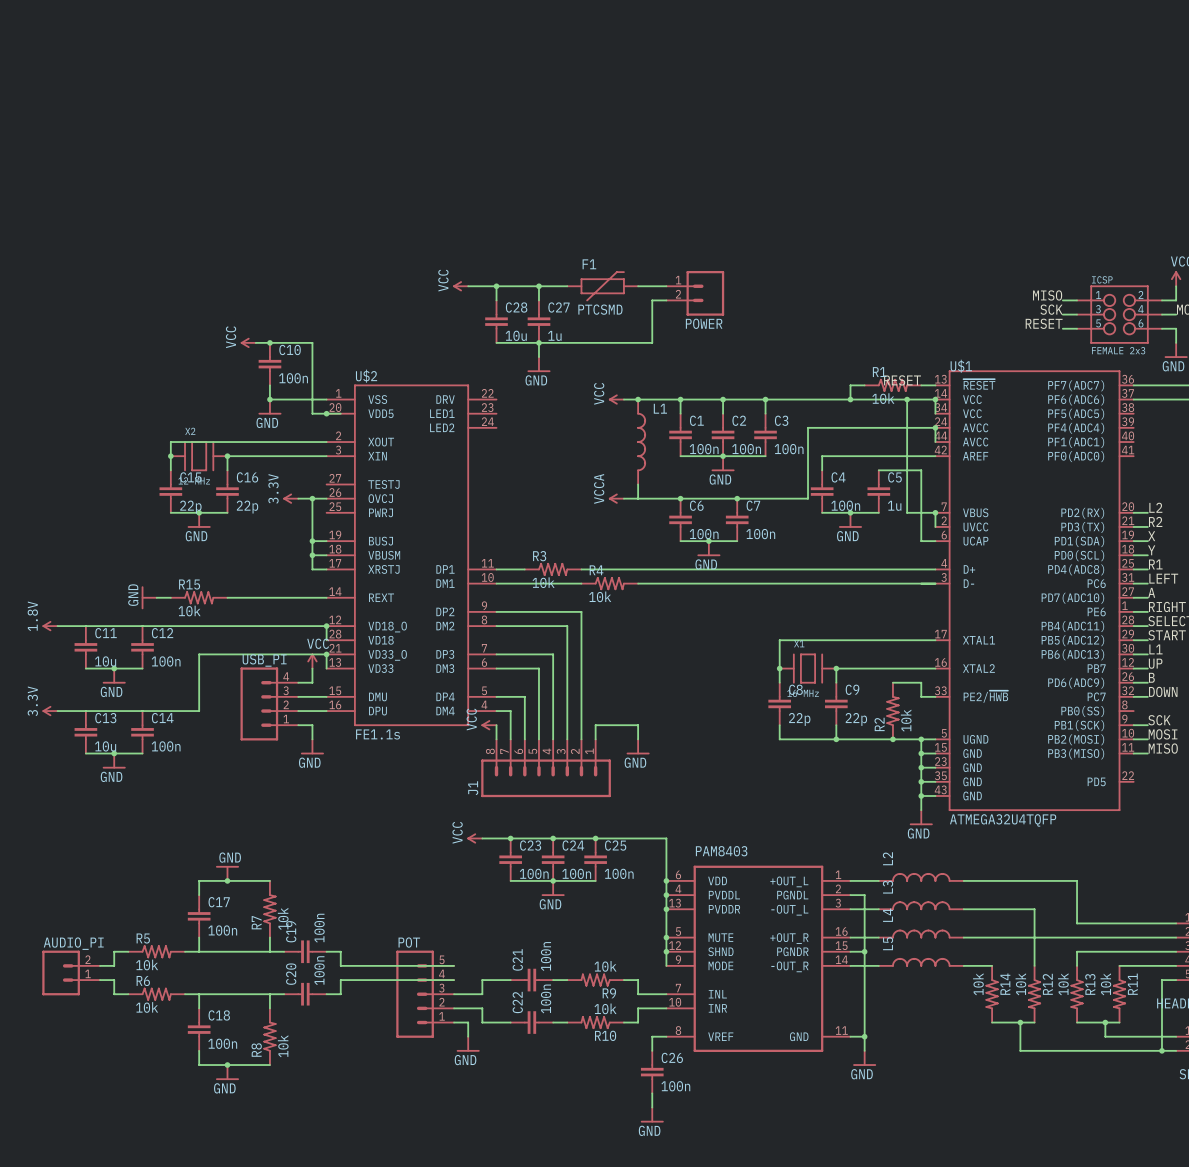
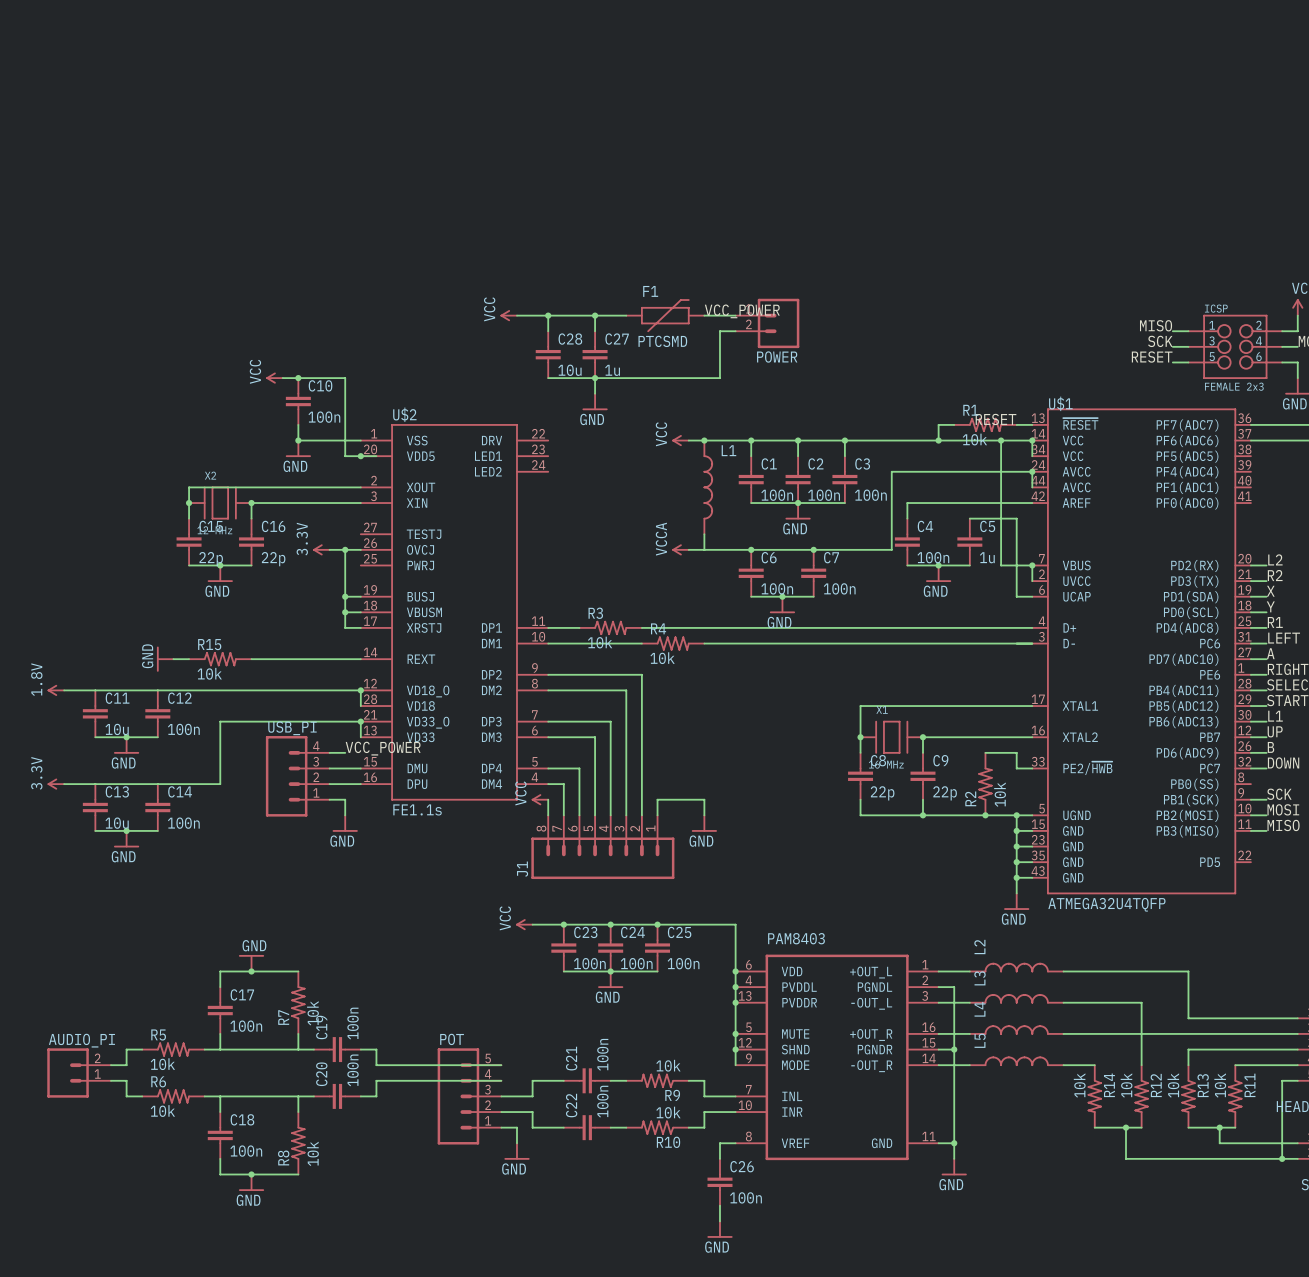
label: none -> VCC_POWER (742, 311)
power symbol: VCC (312, 661) -> none
wire: (312, 668) (312, 682) -> none
label: none -> VCC_POWER (383, 748)

